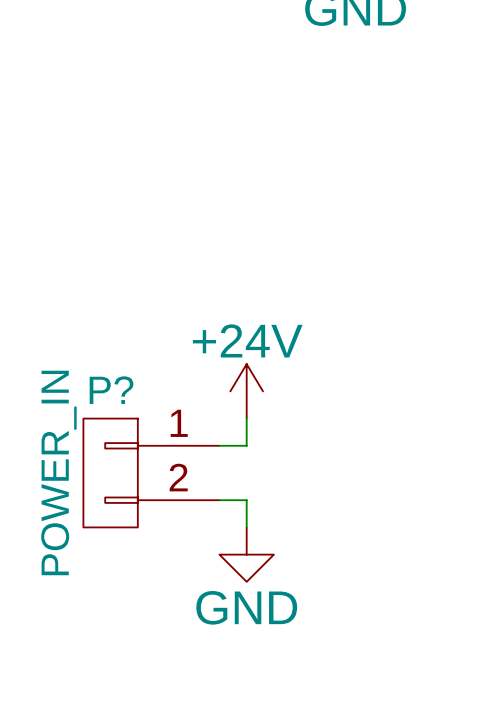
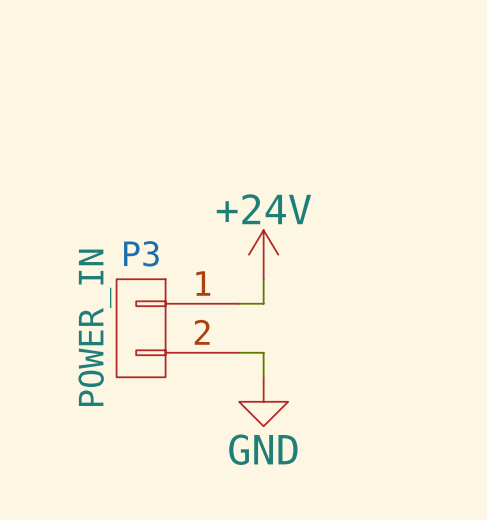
P? name: P? (111, 390) -> P3 (141, 253)

